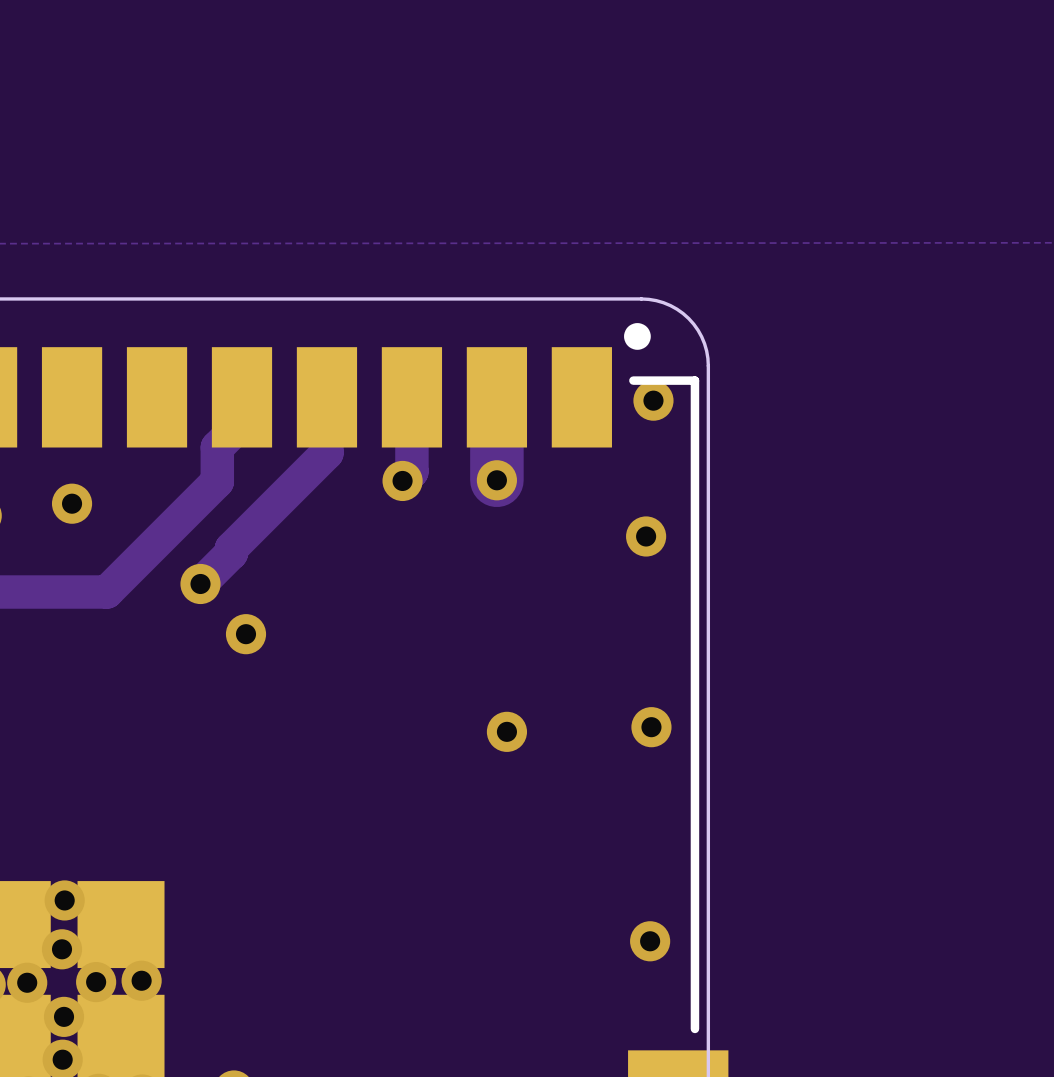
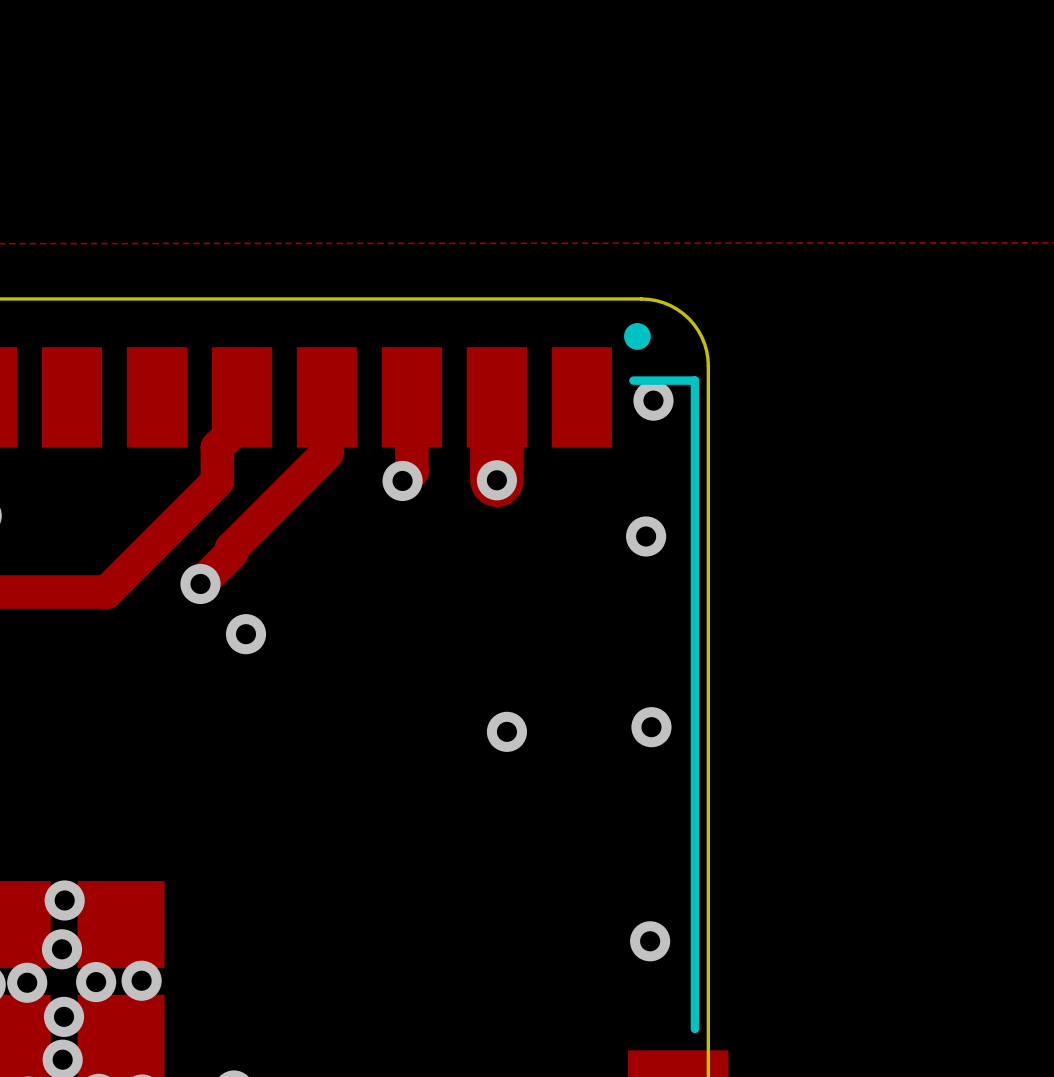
via: (72, 503) -> none

